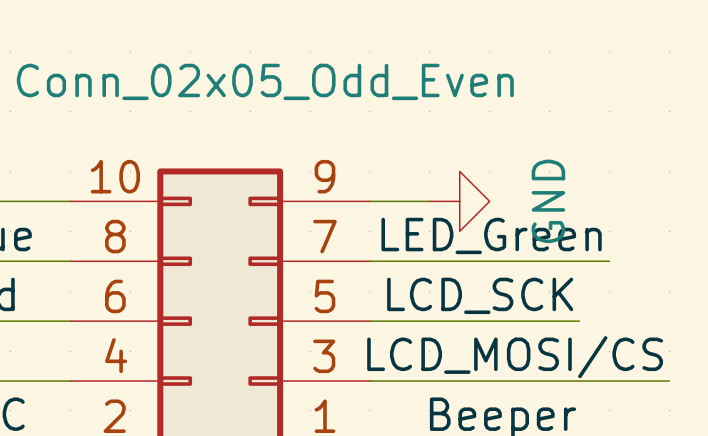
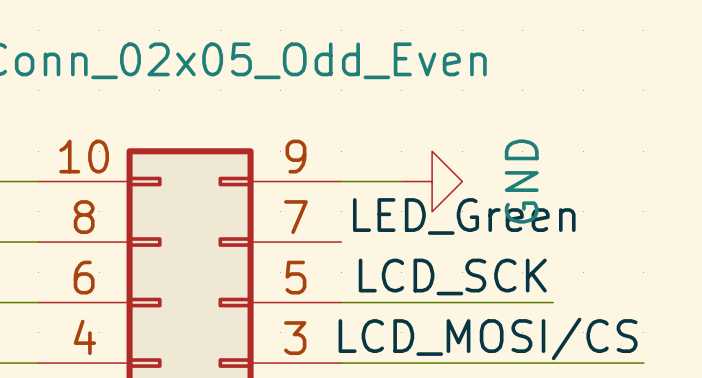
wire: (369, 261) (609, 261) -> none

